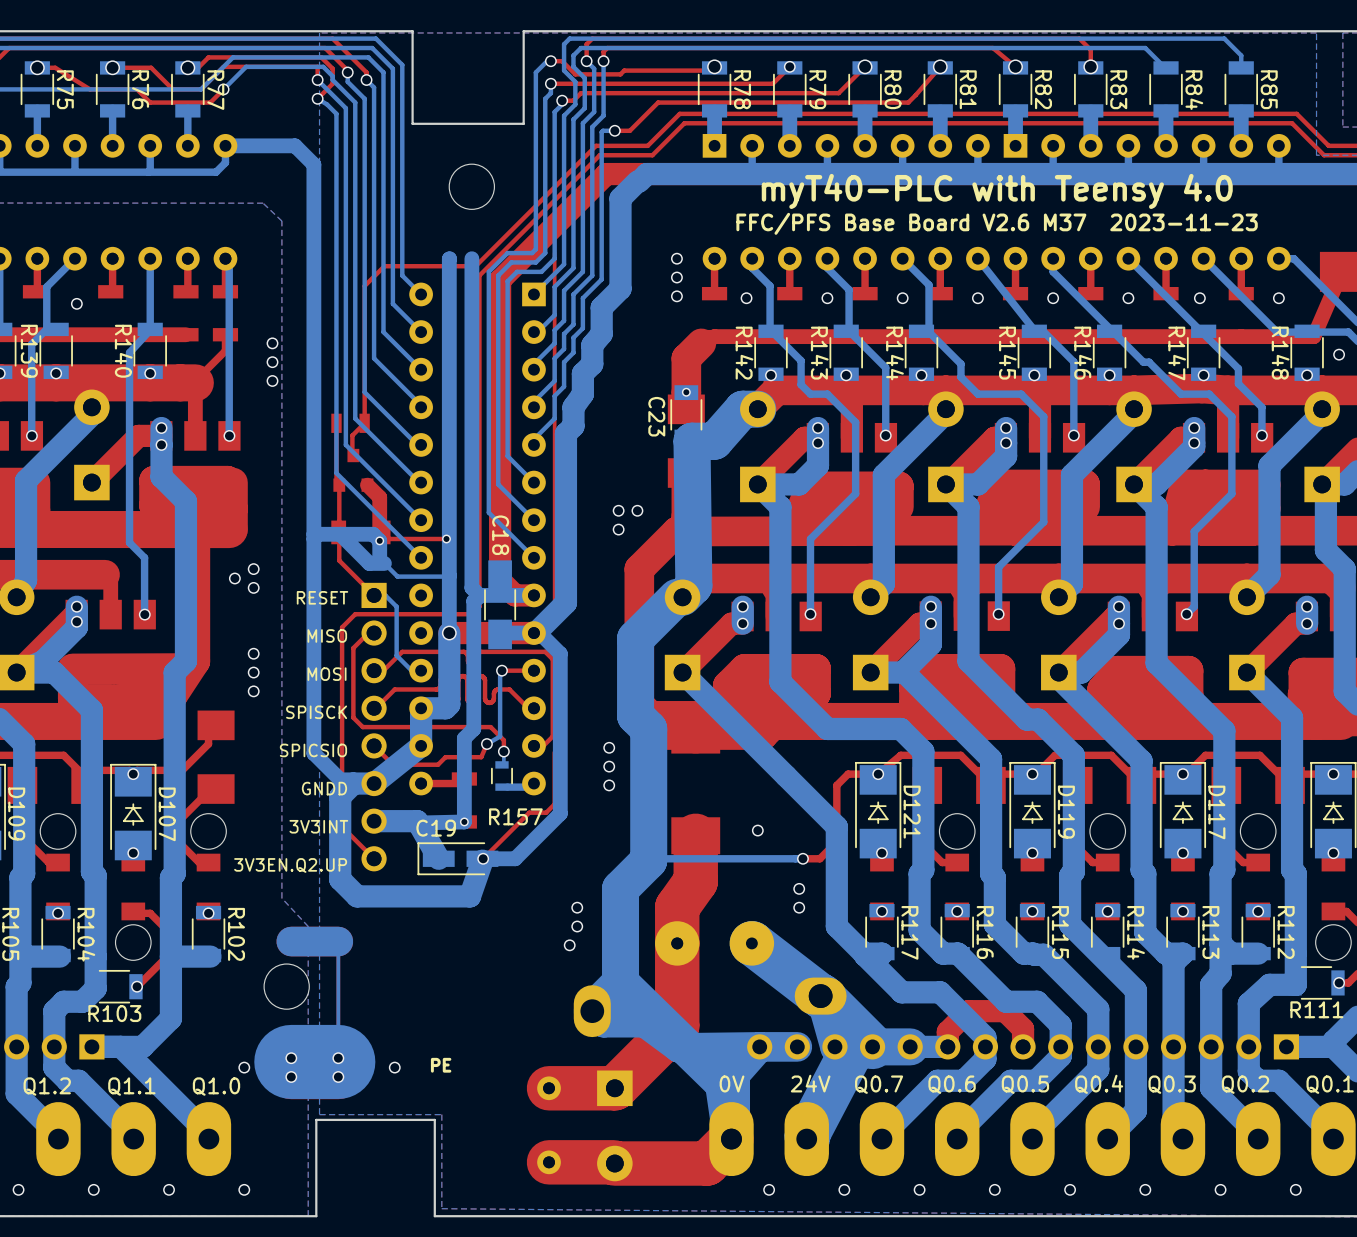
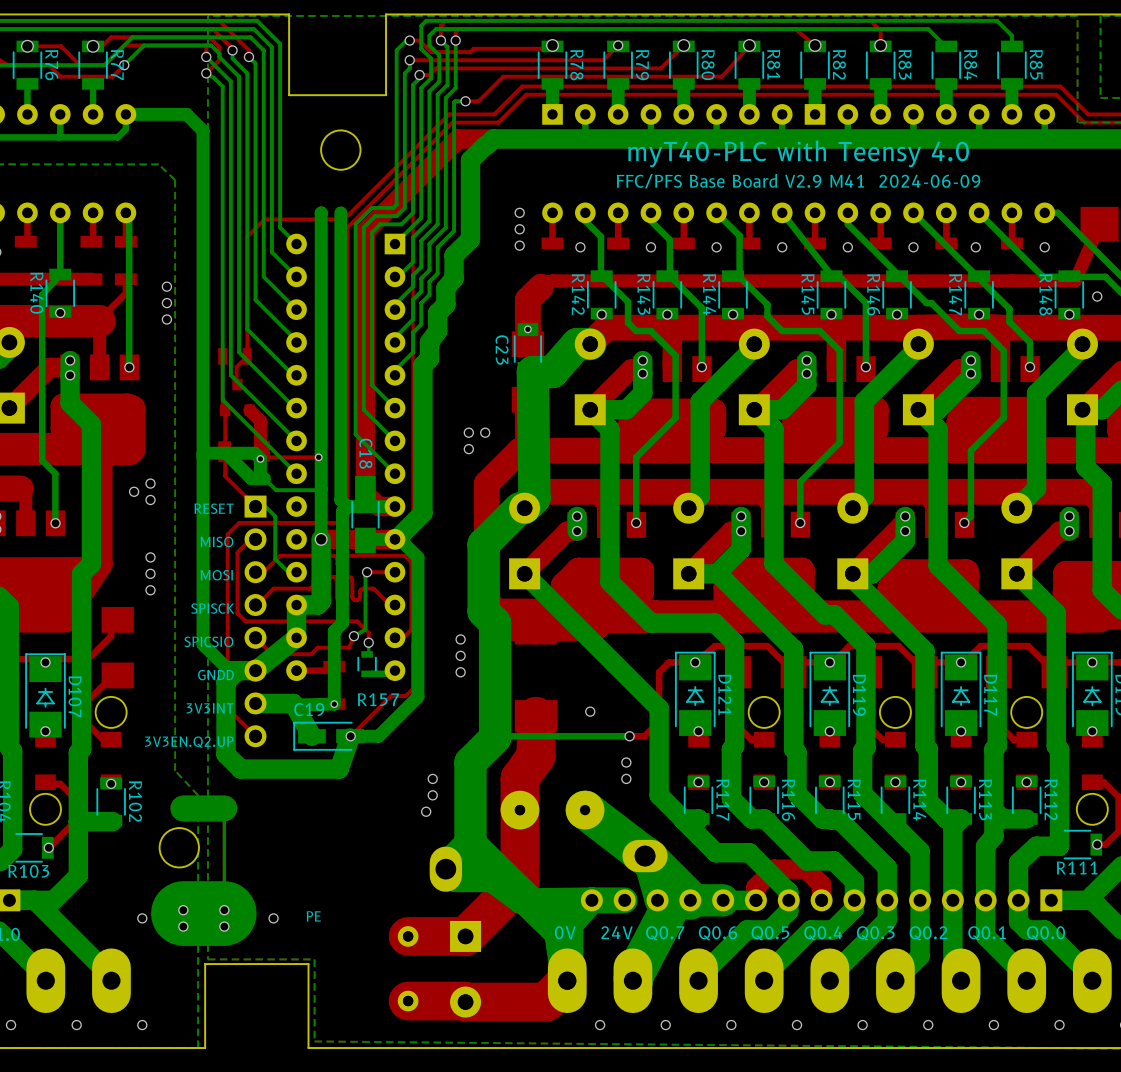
text: FFC/PFS Base Board V2.6 M37 2023-11-23 (997, 223) -> FFC/PFS Base Board V2.9 M41 2024-06-09 (798, 181)

